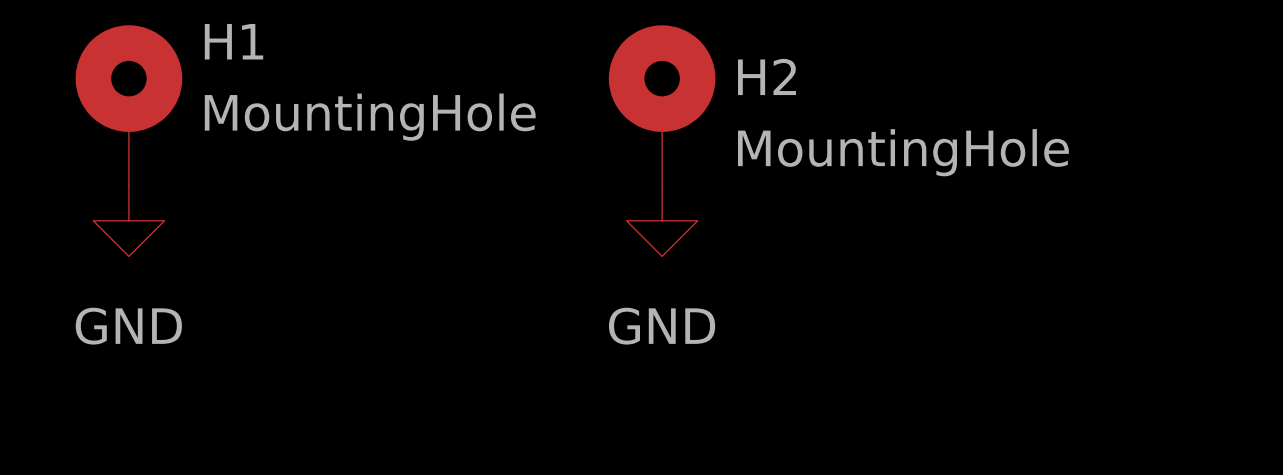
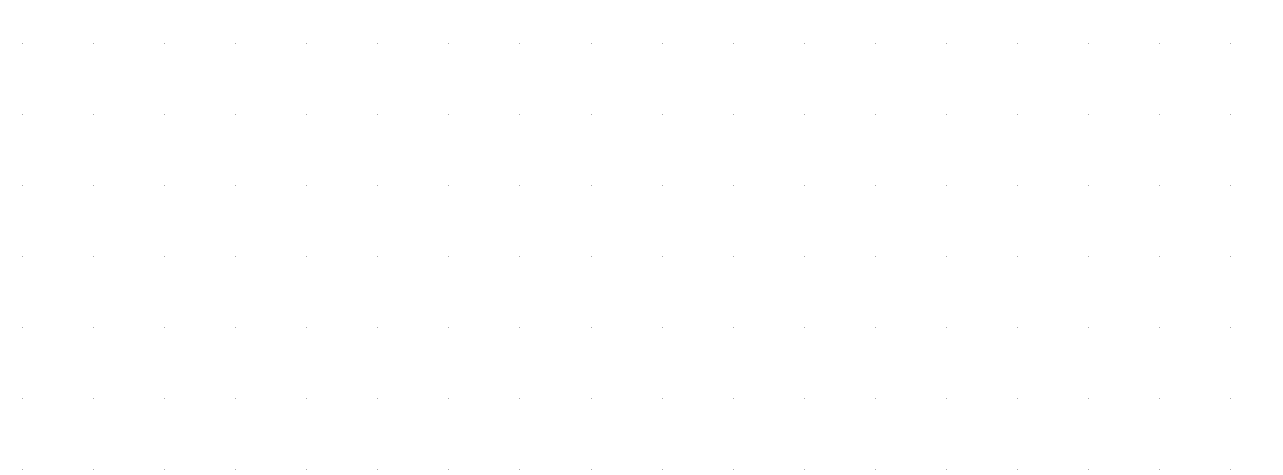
H1: MountingHole (128, 105) -> none
H2: MountingHole (662, 105) -> none
power symbol: GND (128, 220) -> none
power symbol: GND (662, 220) -> none

